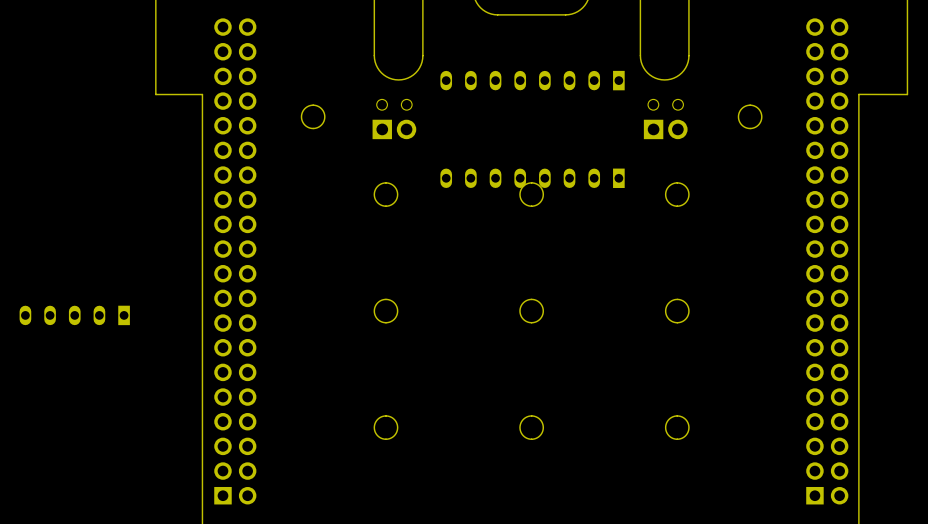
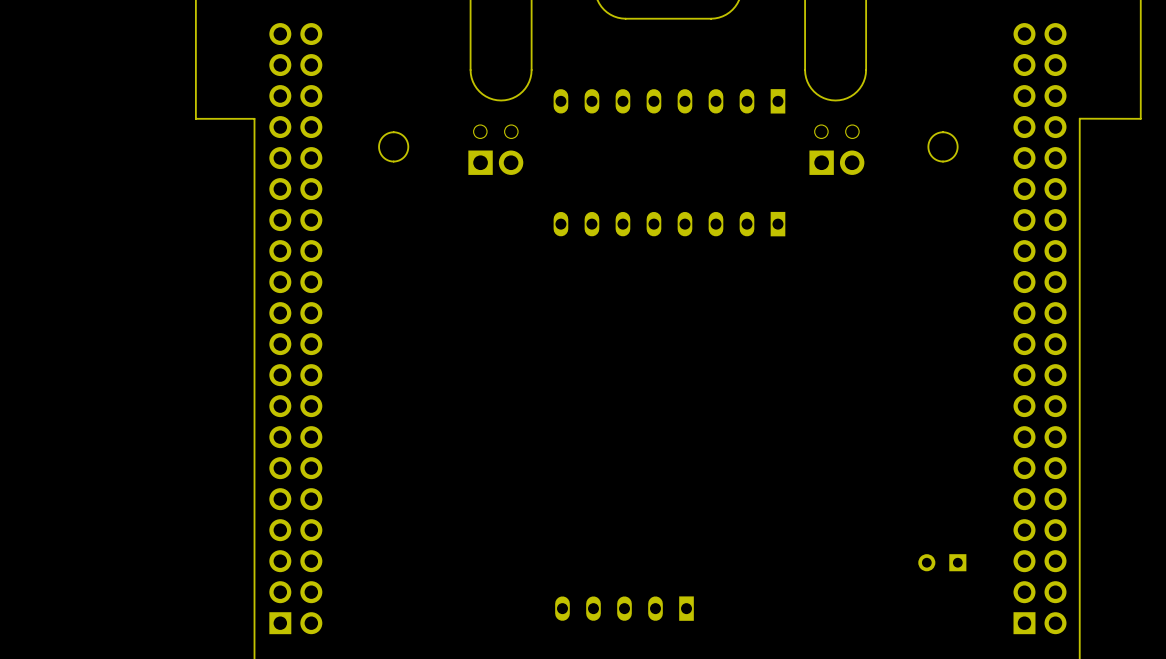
board edge: (385, 182) (394, 186) (397, 194) (394, 202) (385, 206) (377, 202) (374, 194) (377, 186) (385, 182) -> none
board edge: (531, 182) (539, 186) (543, 194) (539, 202) (531, 206) (523, 202) (519, 194) (523, 186) (531, 182) -> none
board edge: (677, 182) (685, 186) (688, 194) (685, 202) (677, 206) (669, 202) (665, 194) (669, 186) (677, 182) -> none
board edge: (385, 299) (394, 302) (397, 311) (394, 319) (385, 322) (377, 319) (374, 311) (377, 302) (385, 299) -> none
board edge: (531, 299) (539, 302) (543, 311) (539, 319) (531, 322) (523, 319) (519, 311) (523, 302) (531, 299) -> none
board edge: (677, 299) (685, 302) (688, 311) (685, 319) (677, 322) (669, 319) (665, 311) (669, 302) (677, 299) -> none
part: (74, 315) -> none
board edge: (385, 415) (394, 419) (397, 427) (394, 435) (385, 439) (377, 435) (374, 427) (377, 419) (385, 415) -> none
board edge: (531, 415) (539, 419) (543, 427) (539, 435) (531, 439) (523, 435) (519, 427) (523, 419) (531, 415) -> none
board edge: (677, 415) (685, 419) (688, 427) (685, 435) (677, 439) (669, 435) (665, 427) (669, 419) (677, 415) -> none
part: none -> (942, 562)
part: none -> (624, 608)

